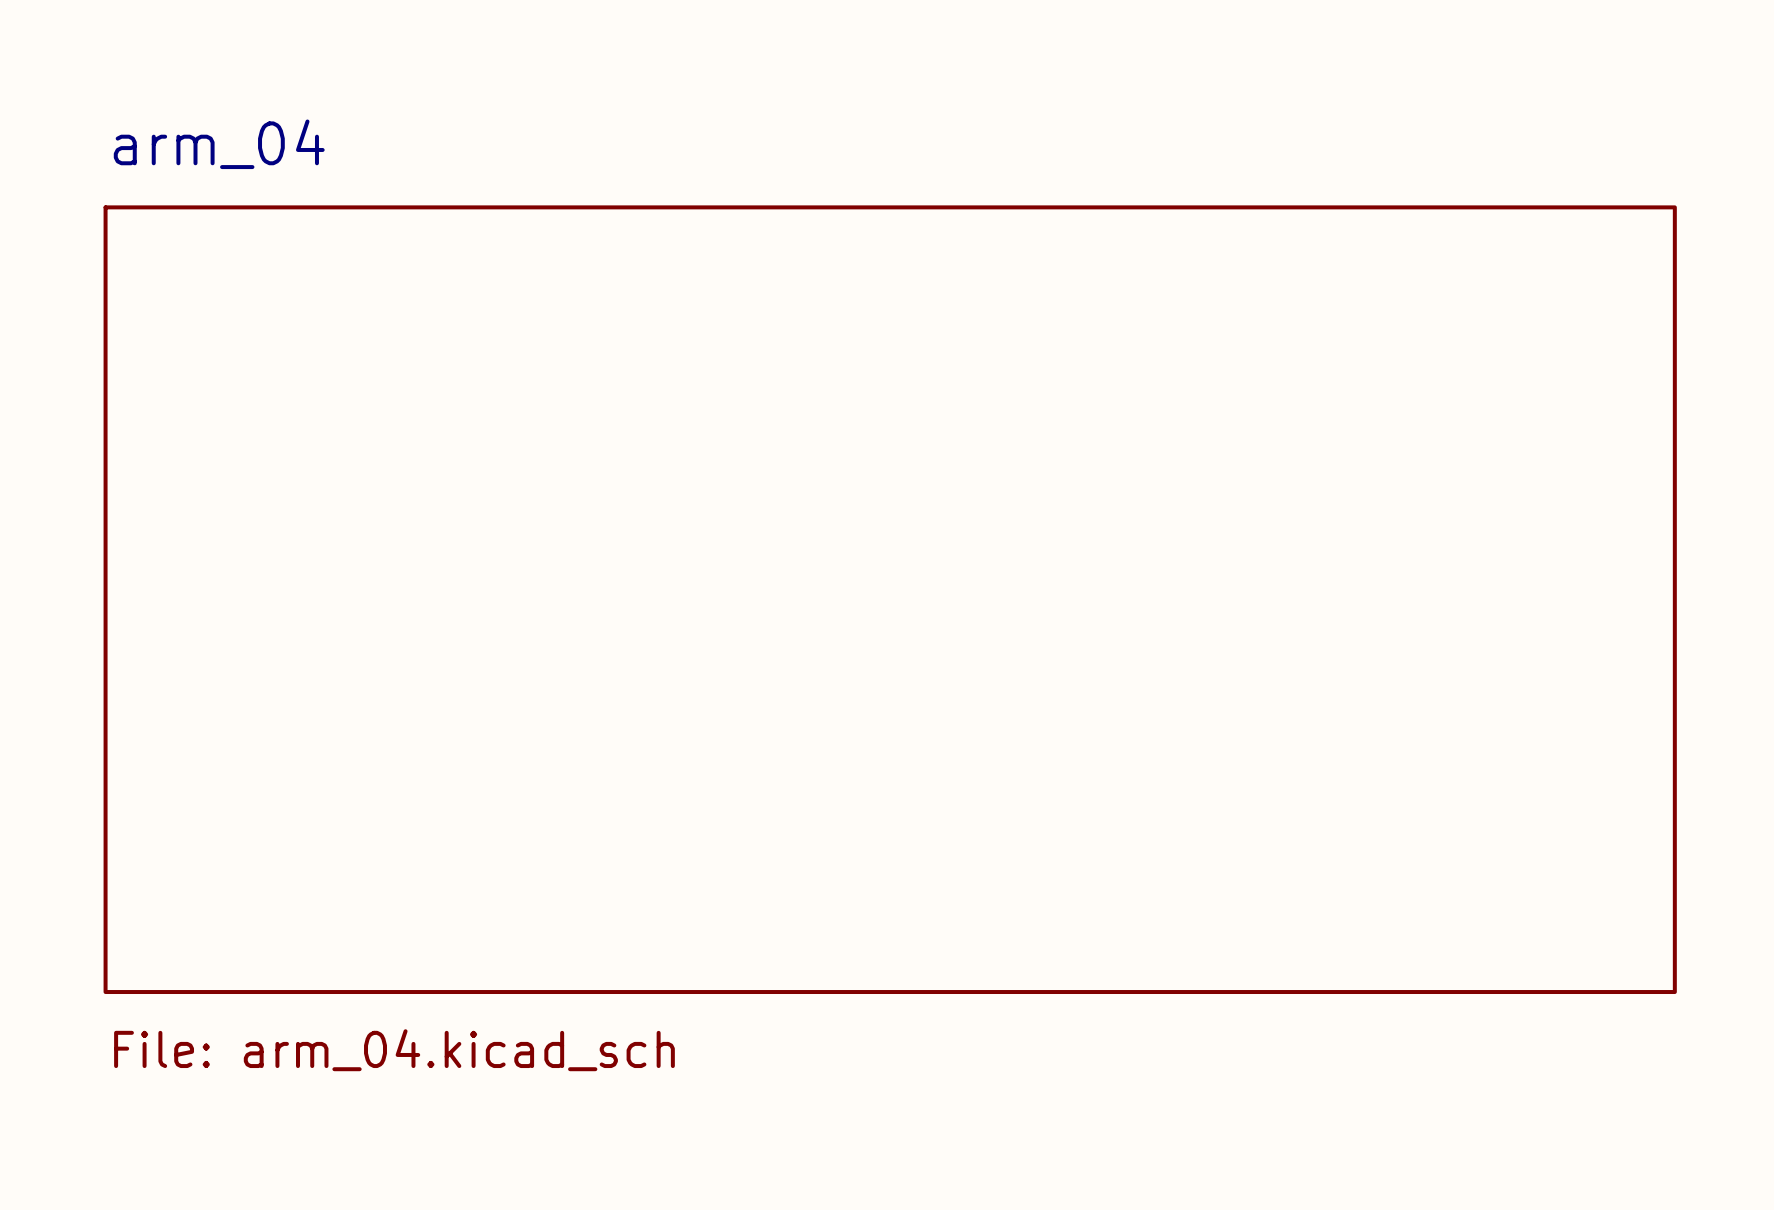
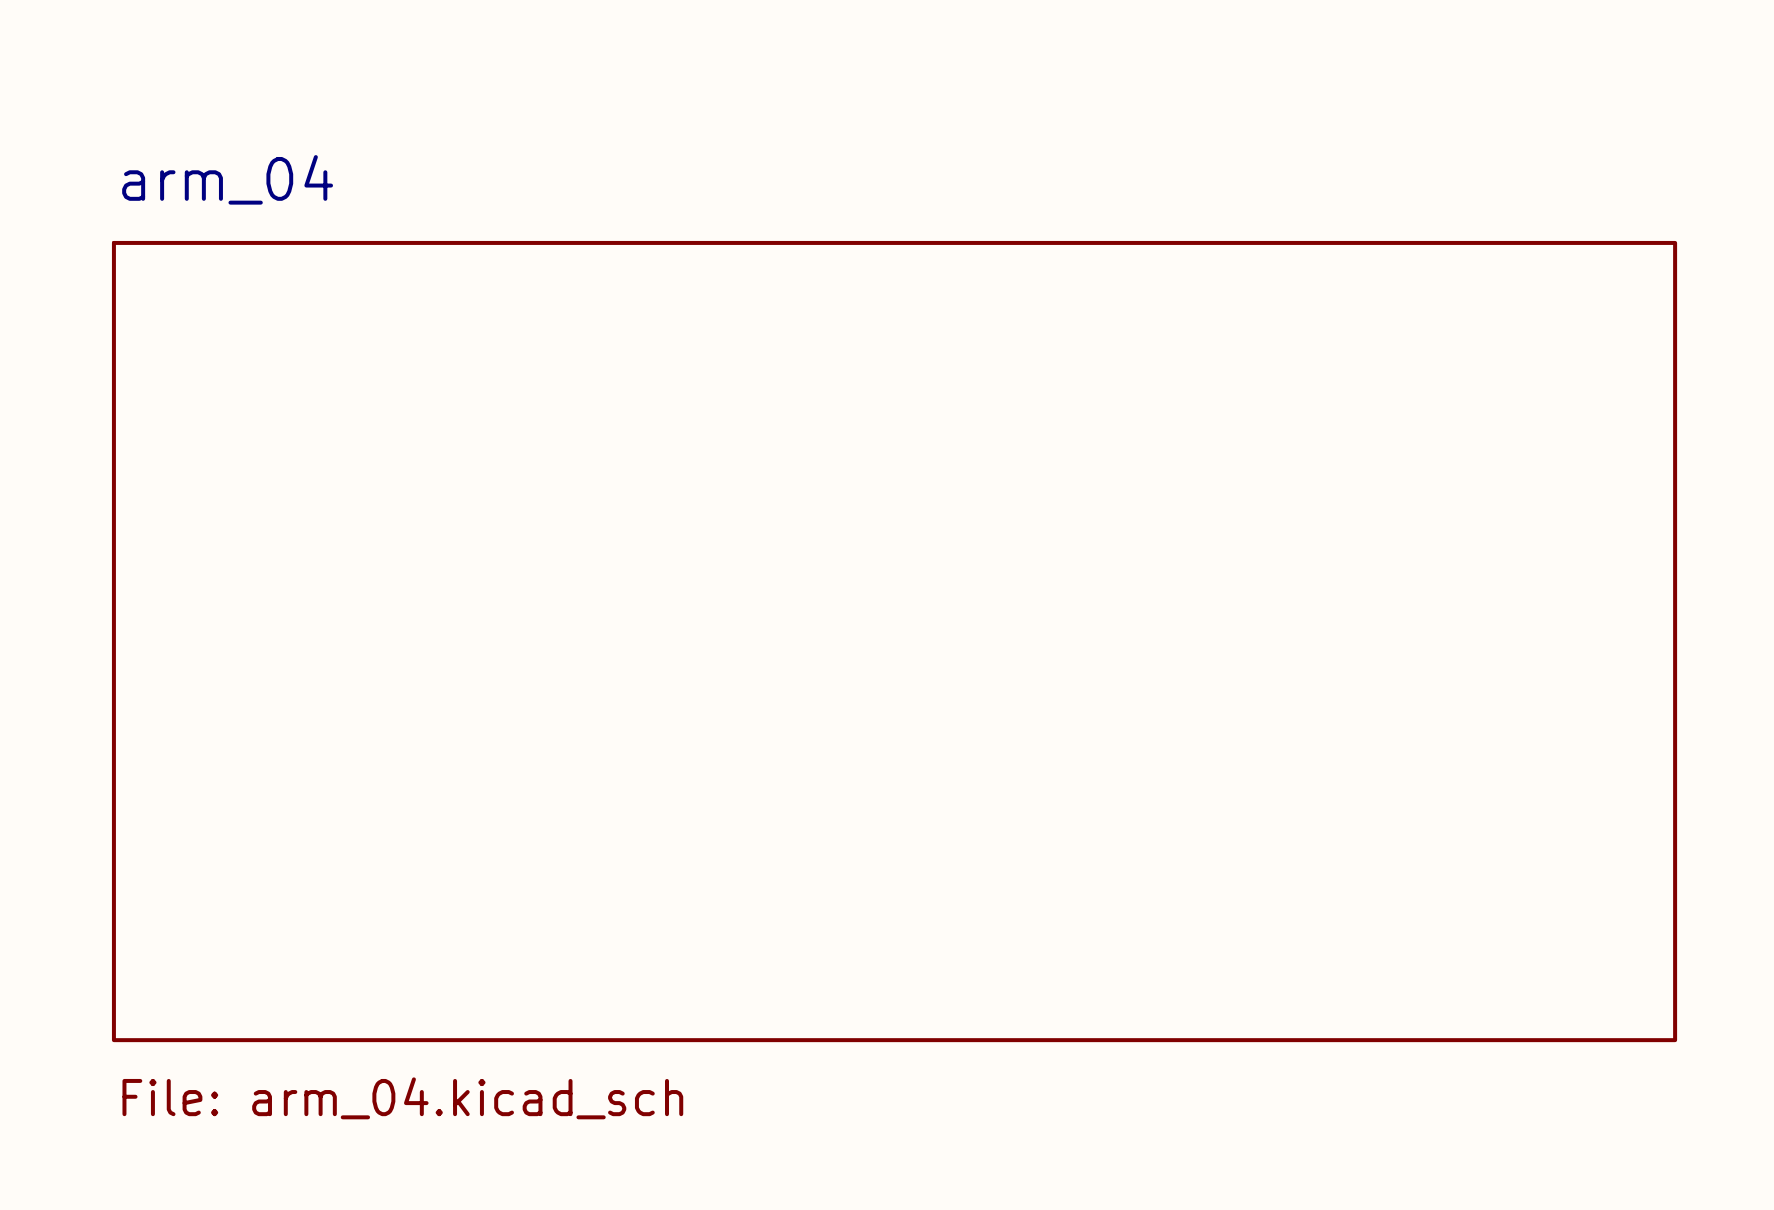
sheet arm_04 shape: [103, 205, 1677, 995] -> [111, 240, 1678, 1043]

